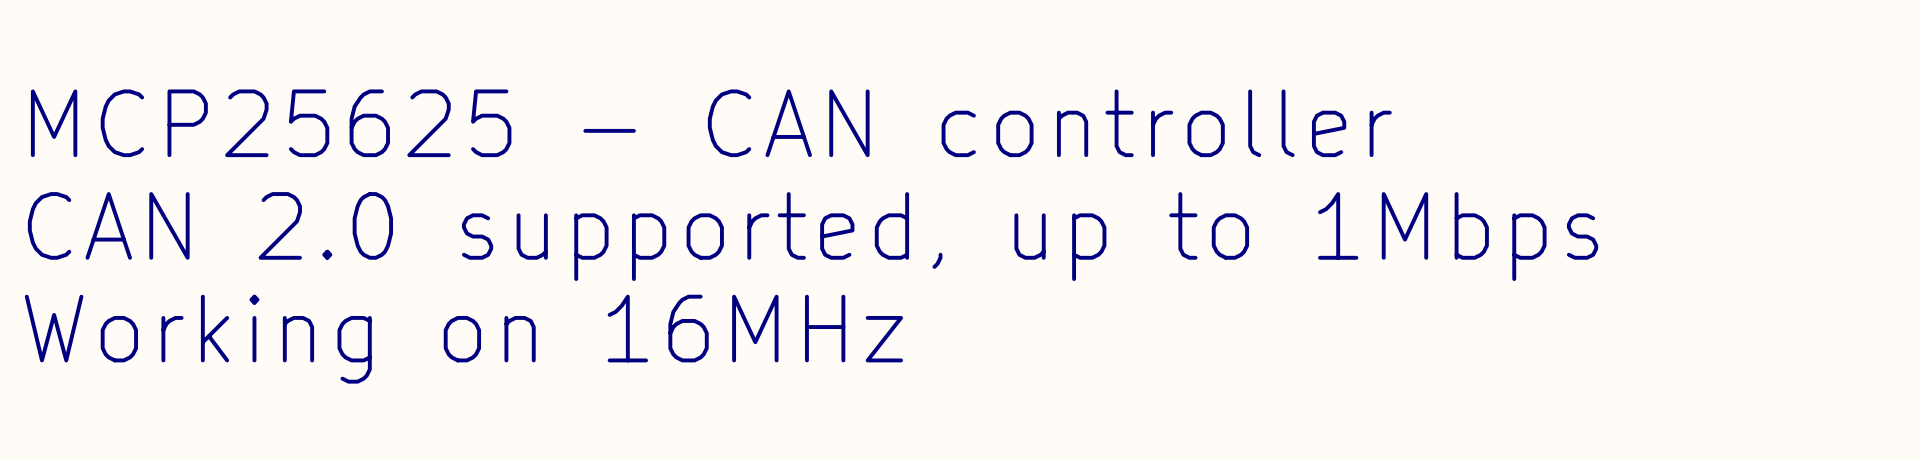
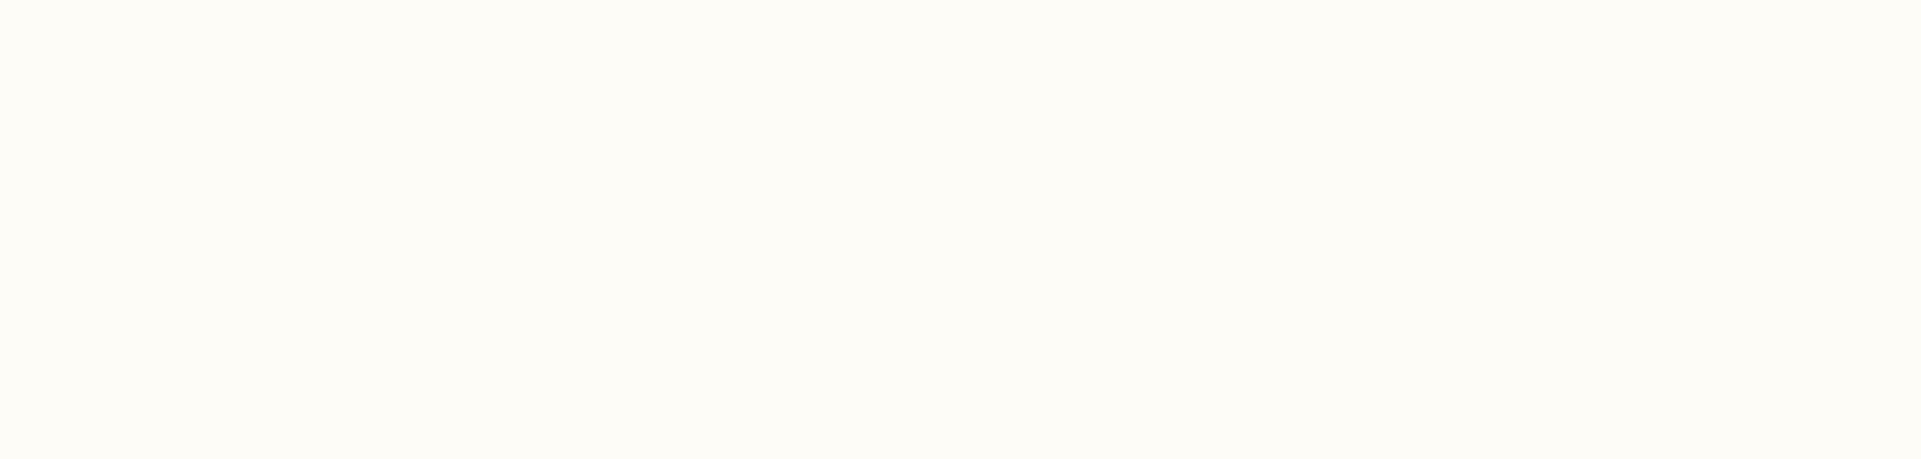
text: MCP25625 - CAN controller (711, 123) -> none
text: CAN 2.0 supported, up to 1Mbps (813, 236) -> none
text: Working on 16MHz (463, 339) -> none

